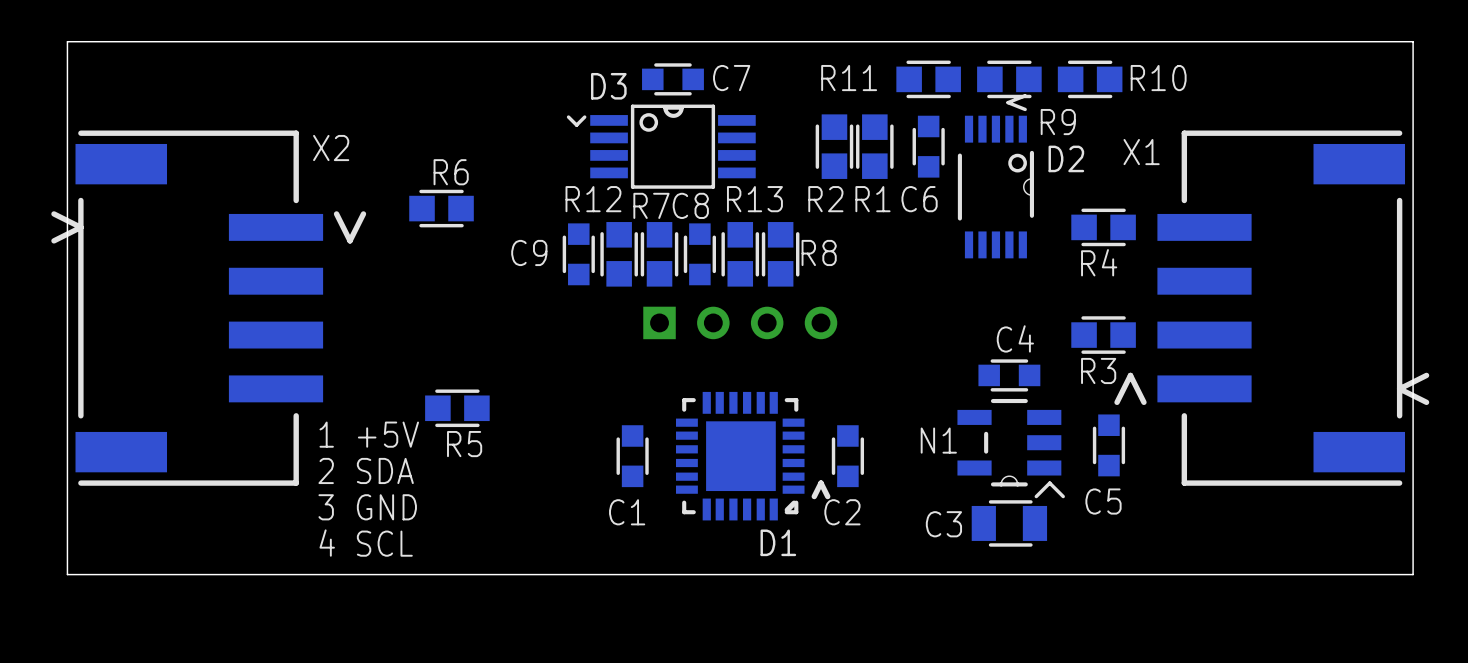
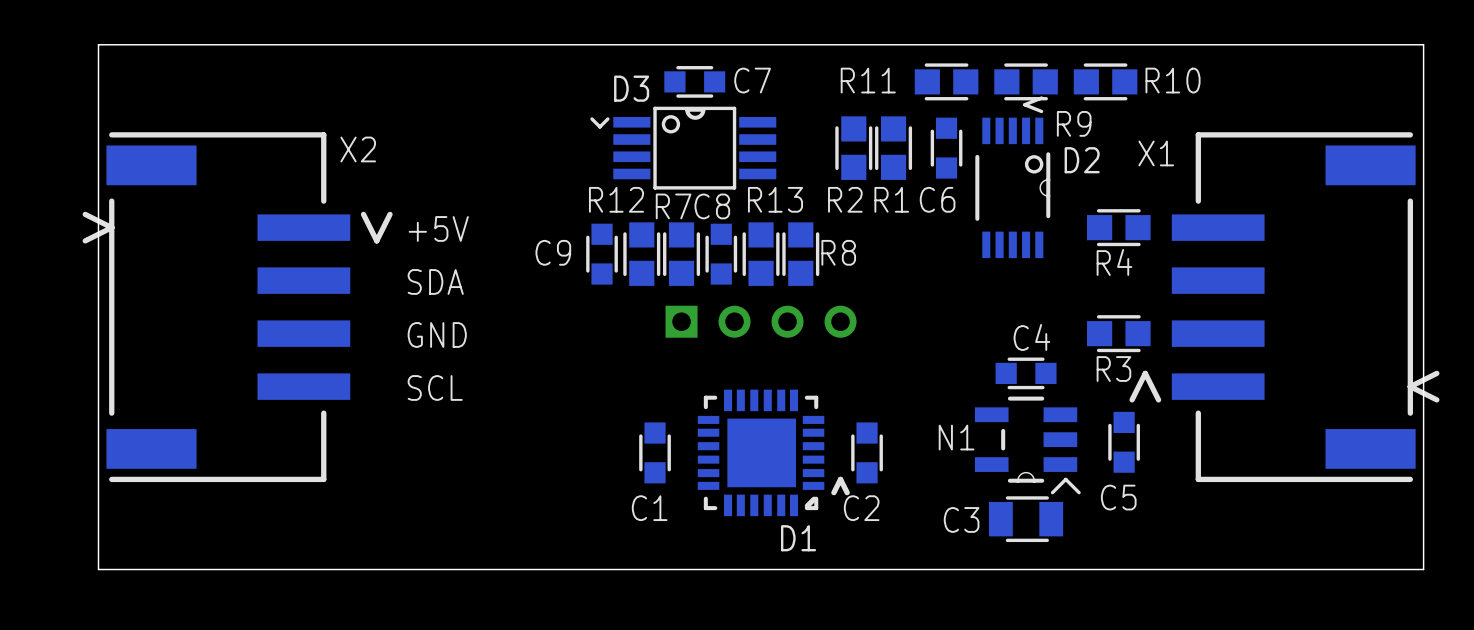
R6: (441, 208) -> none
text: none -> +5V (438, 228)
text: none -> SDA (435, 281)
text: none -> GND (437, 334)
text: none -> SCL (435, 387)
R5: (457, 408) -> none
text: 1 +5V (369, 434) -> none
text: 2 SDA (366, 470) -> none
text: 3 GND (367, 507) -> none
text: 4 SCL (366, 543) -> none

